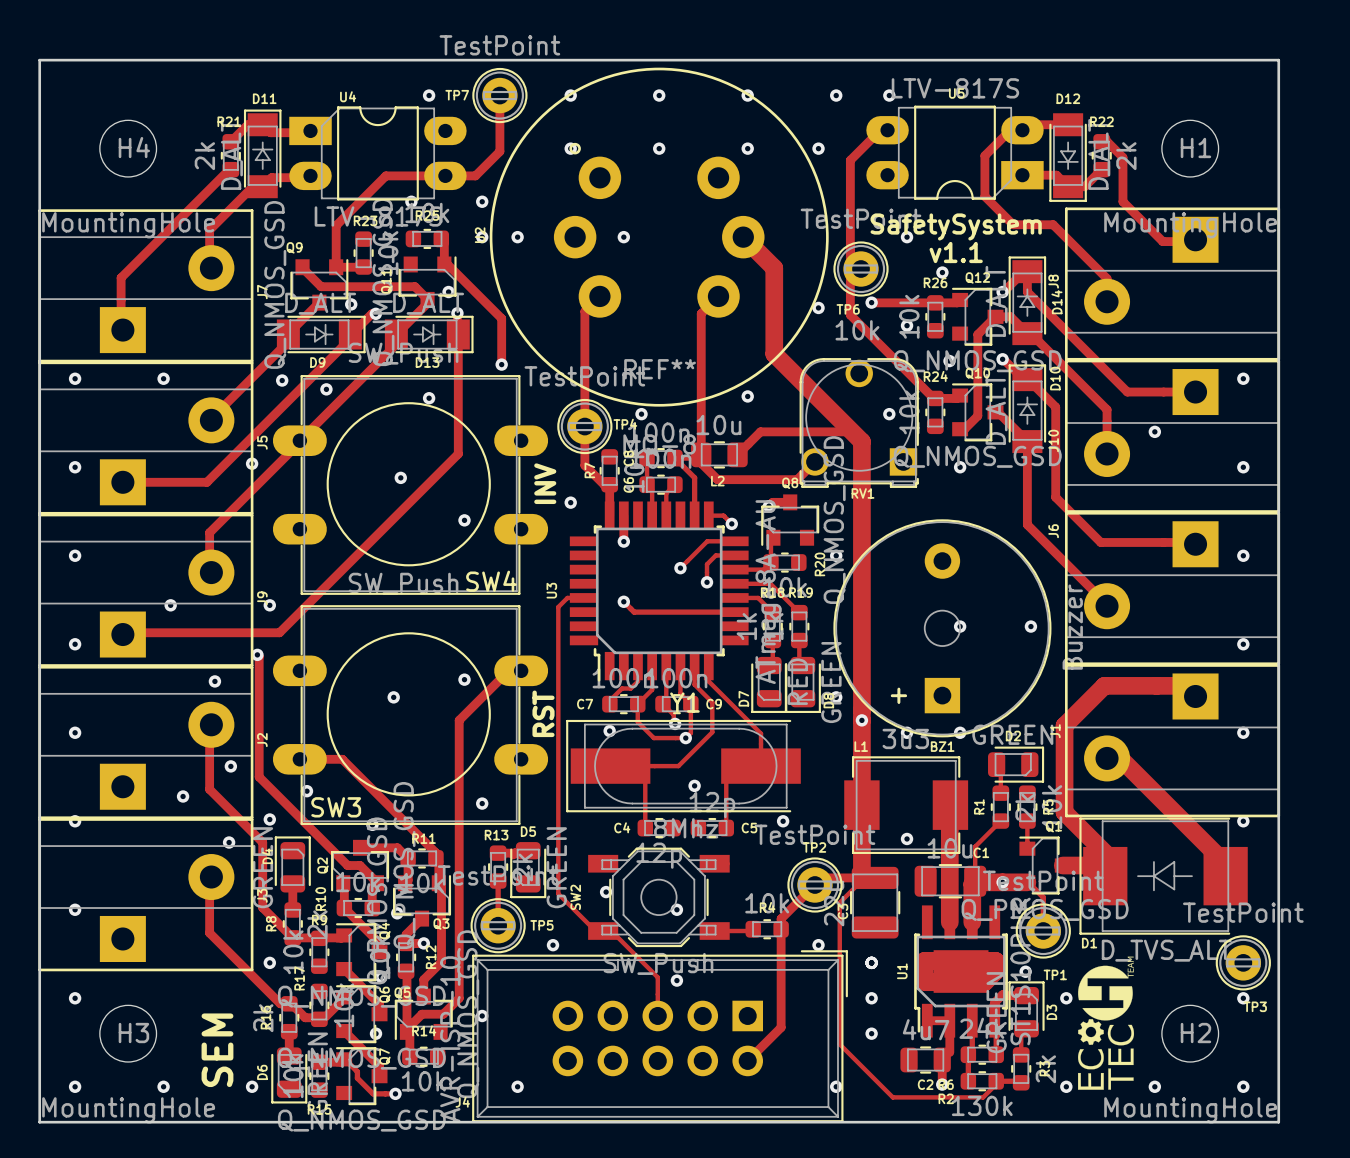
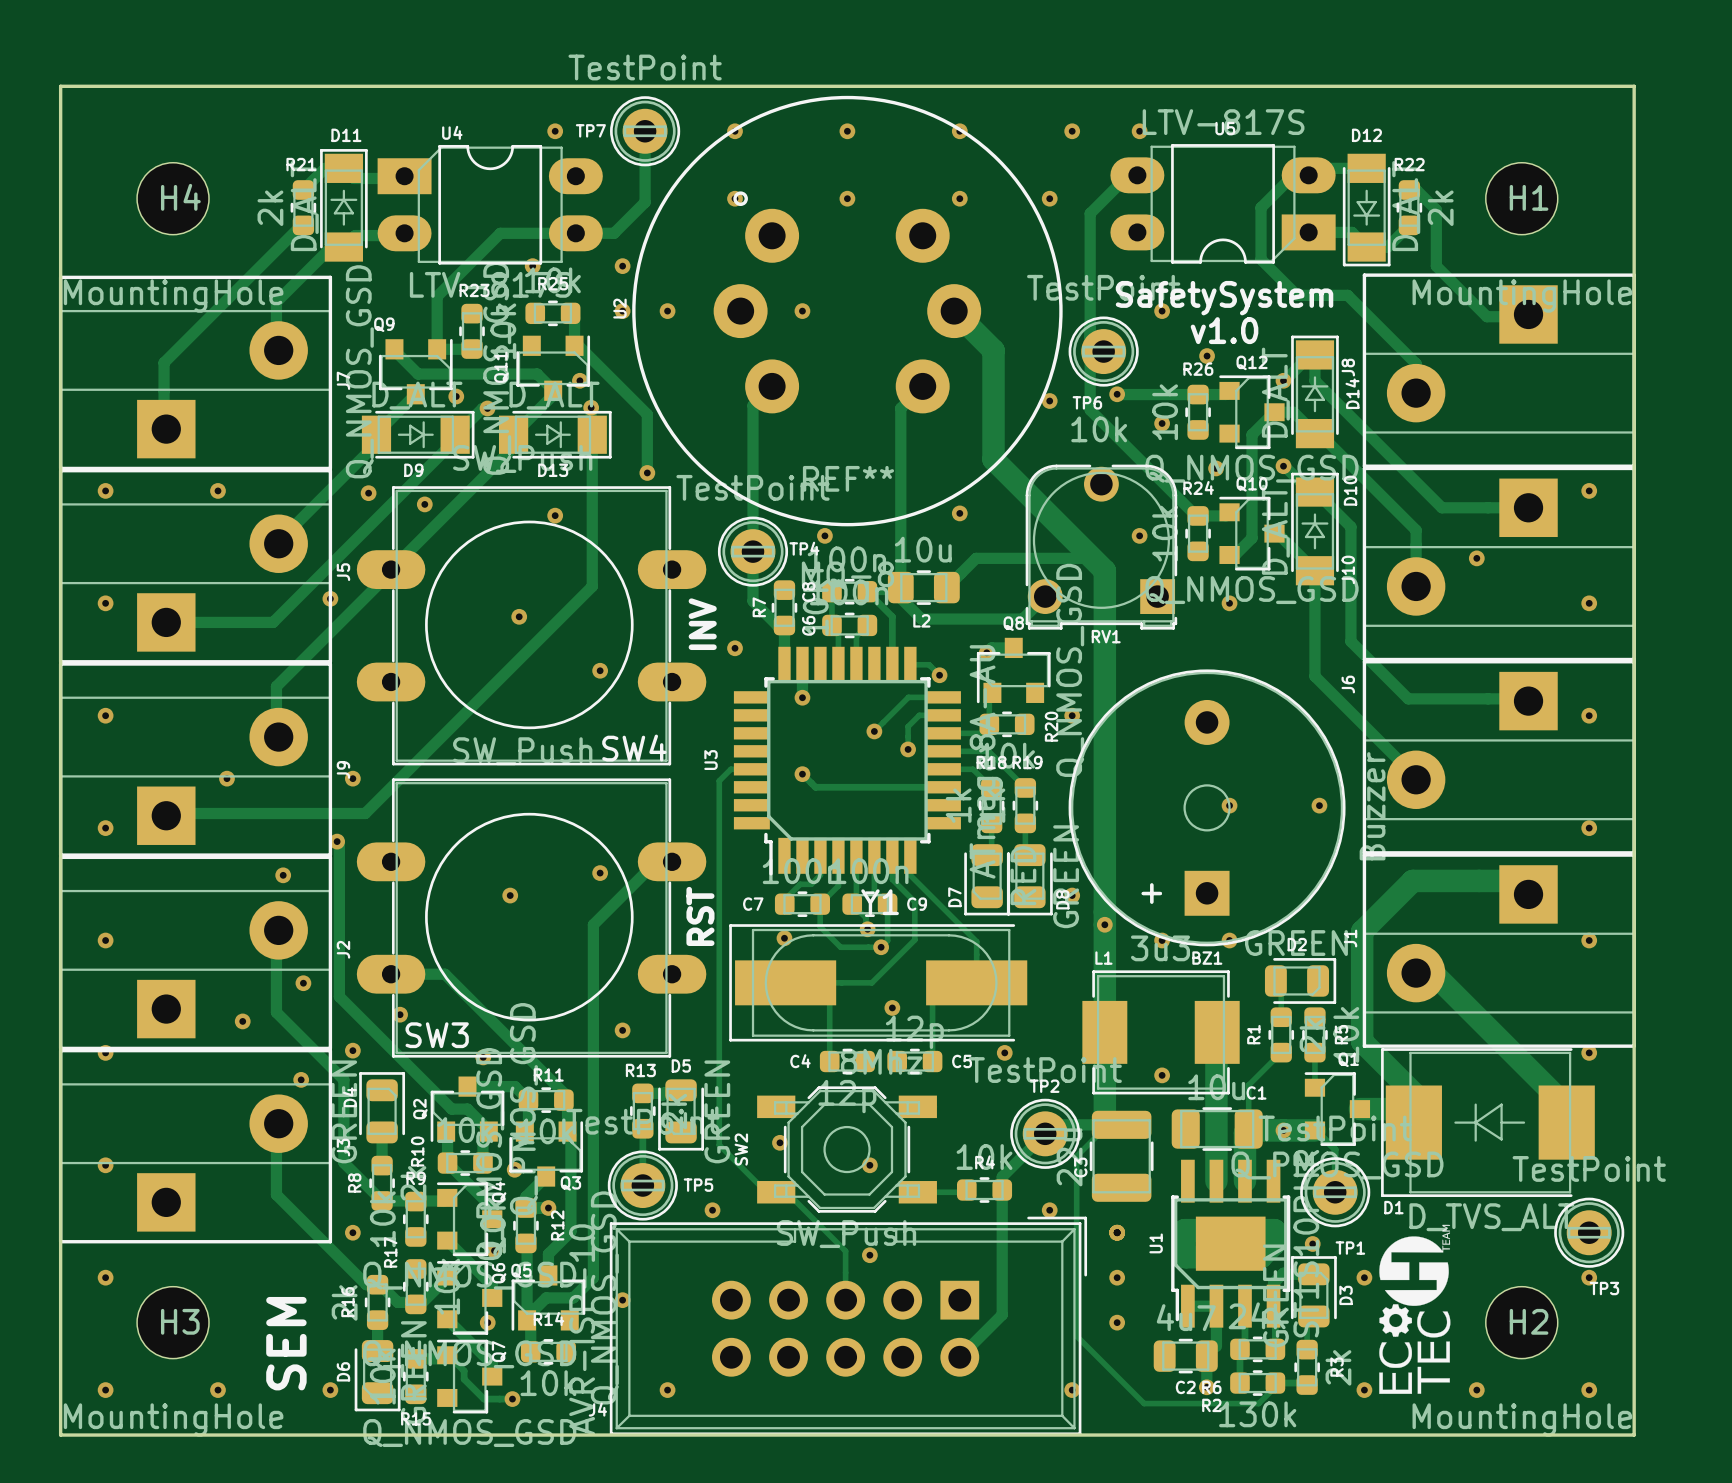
text: v1.1 (956, 252) -> v1.0 (1224, 330)

